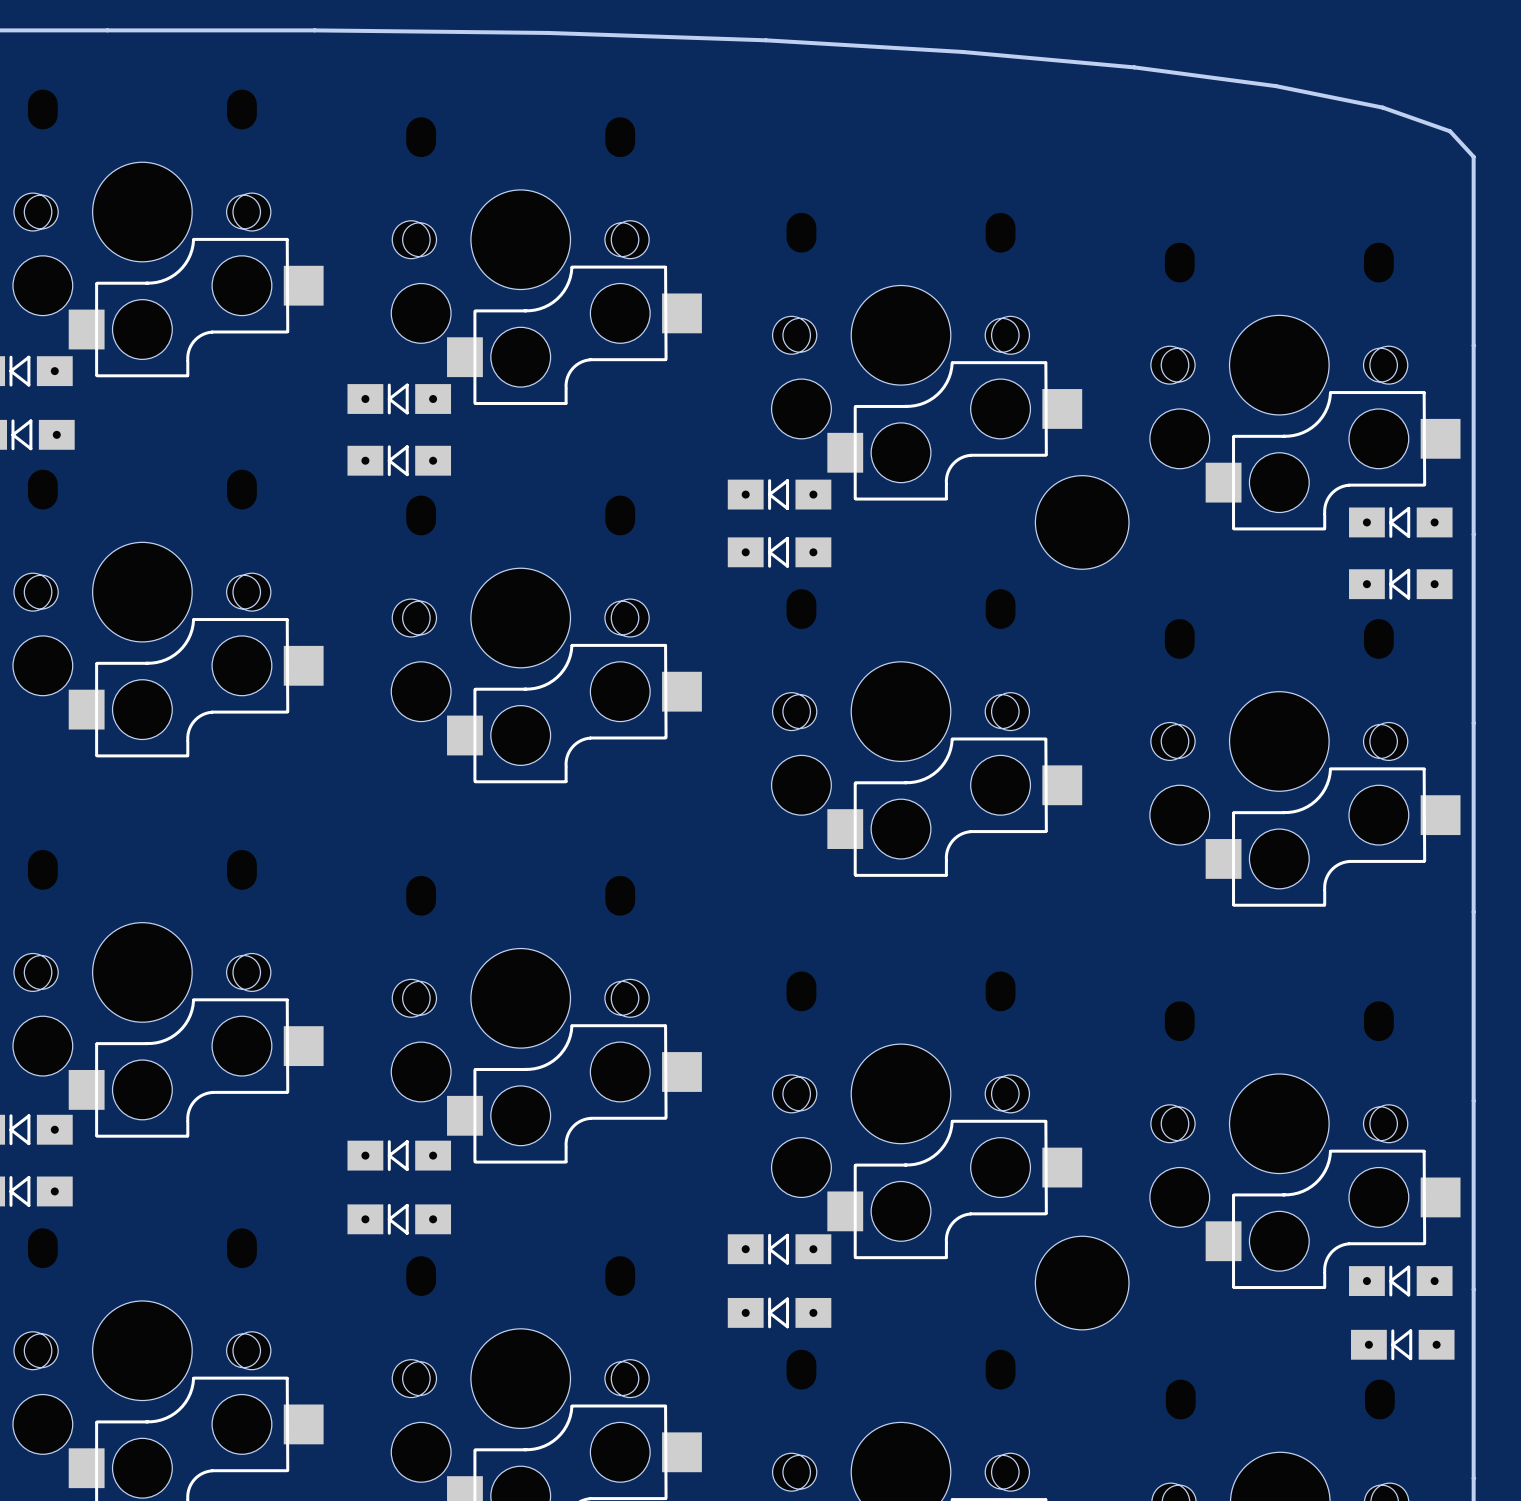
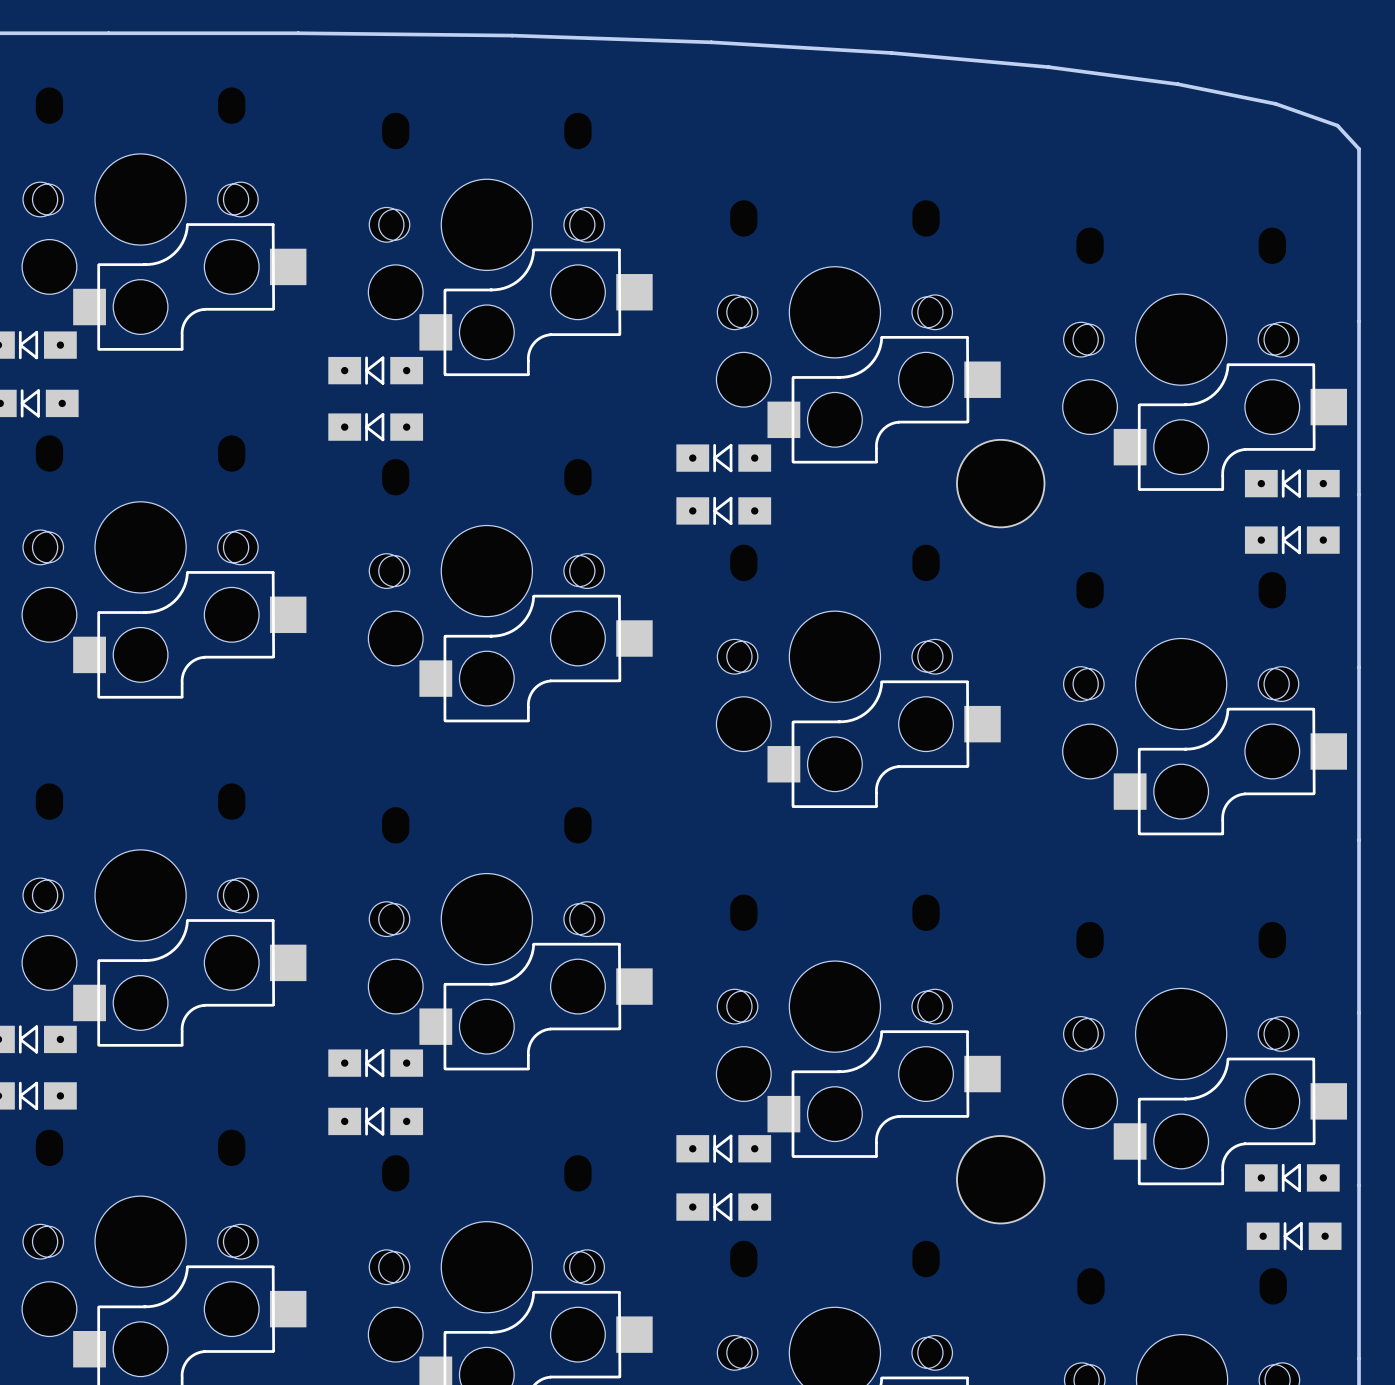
part footprint: [1035, 475, 1129, 570] -> [956, 438, 1046, 529]
part footprint: [1035, 1236, 1129, 1330] -> [956, 1135, 1046, 1225]

